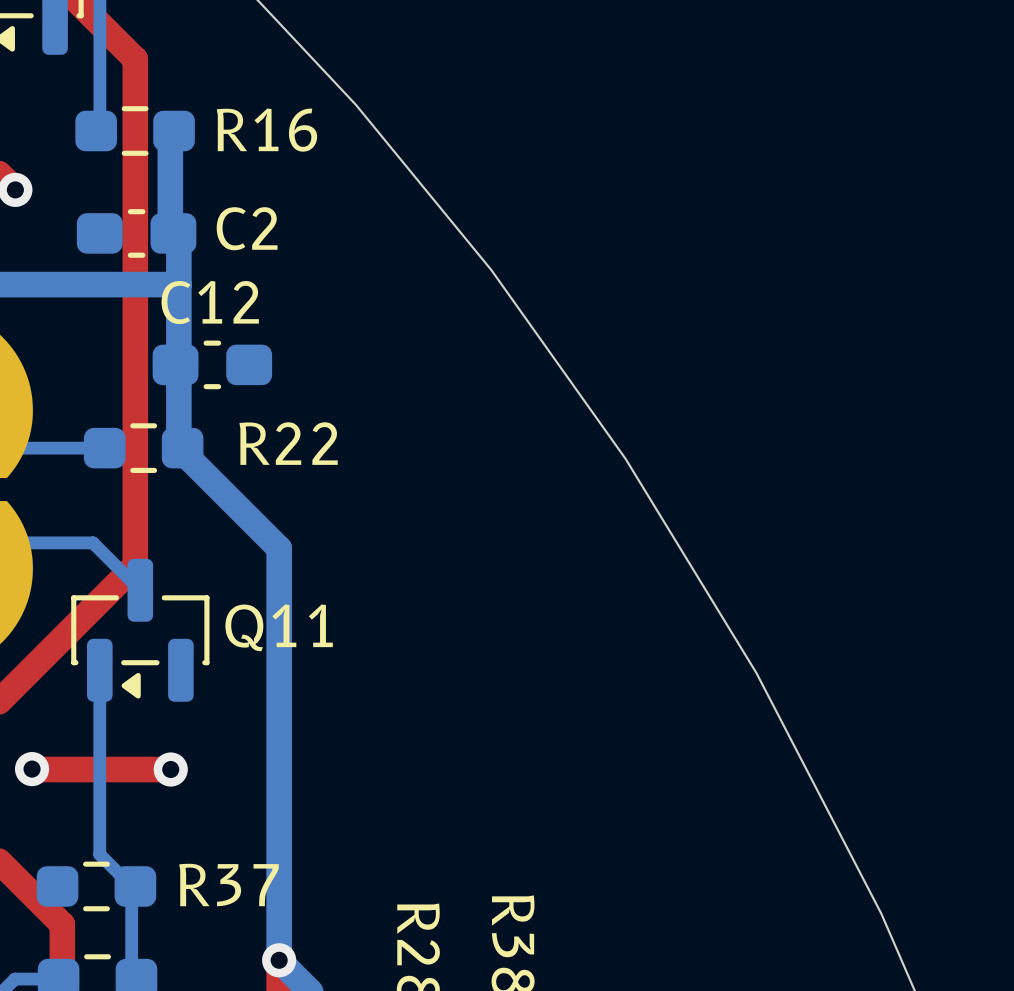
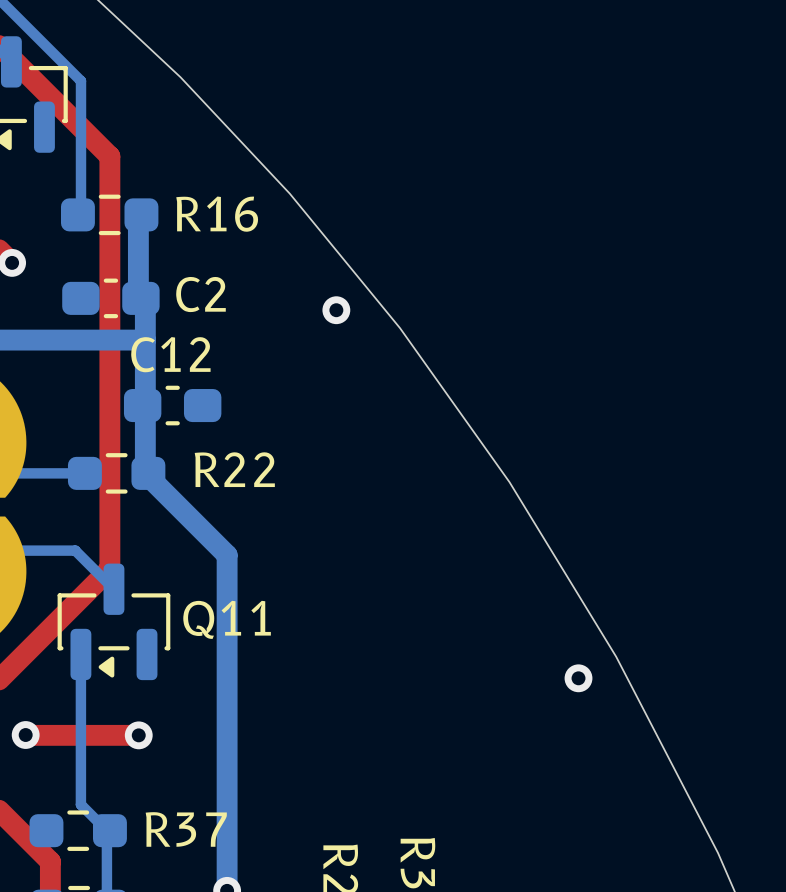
via: none -> (336, 310)
via: none -> (578, 678)

